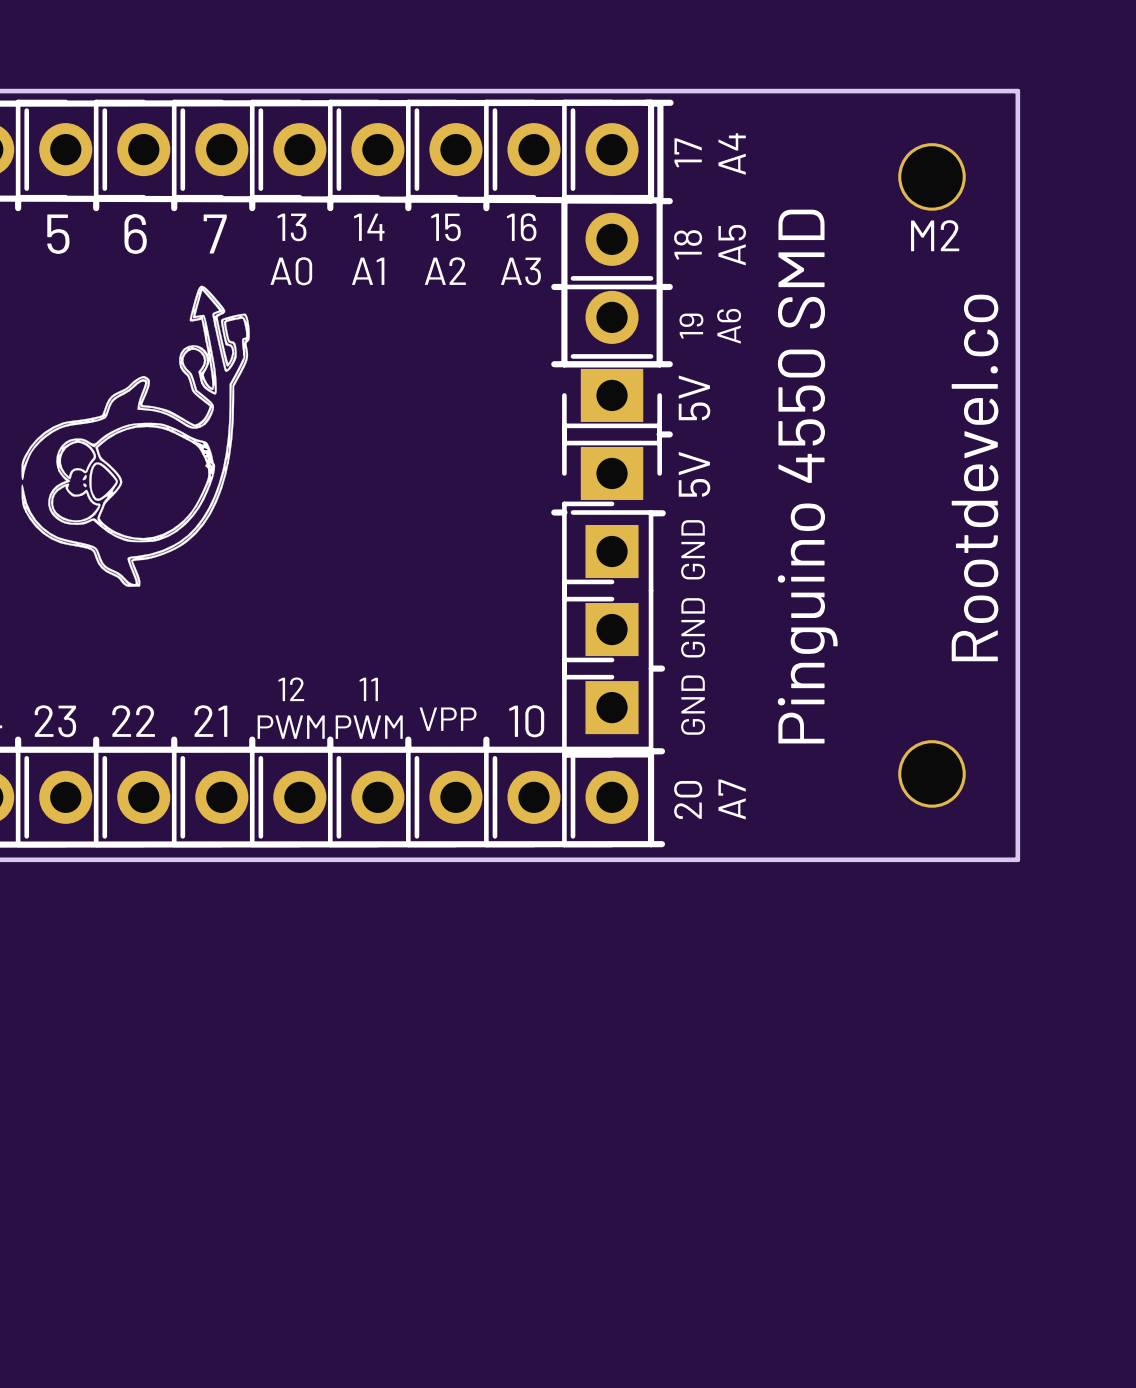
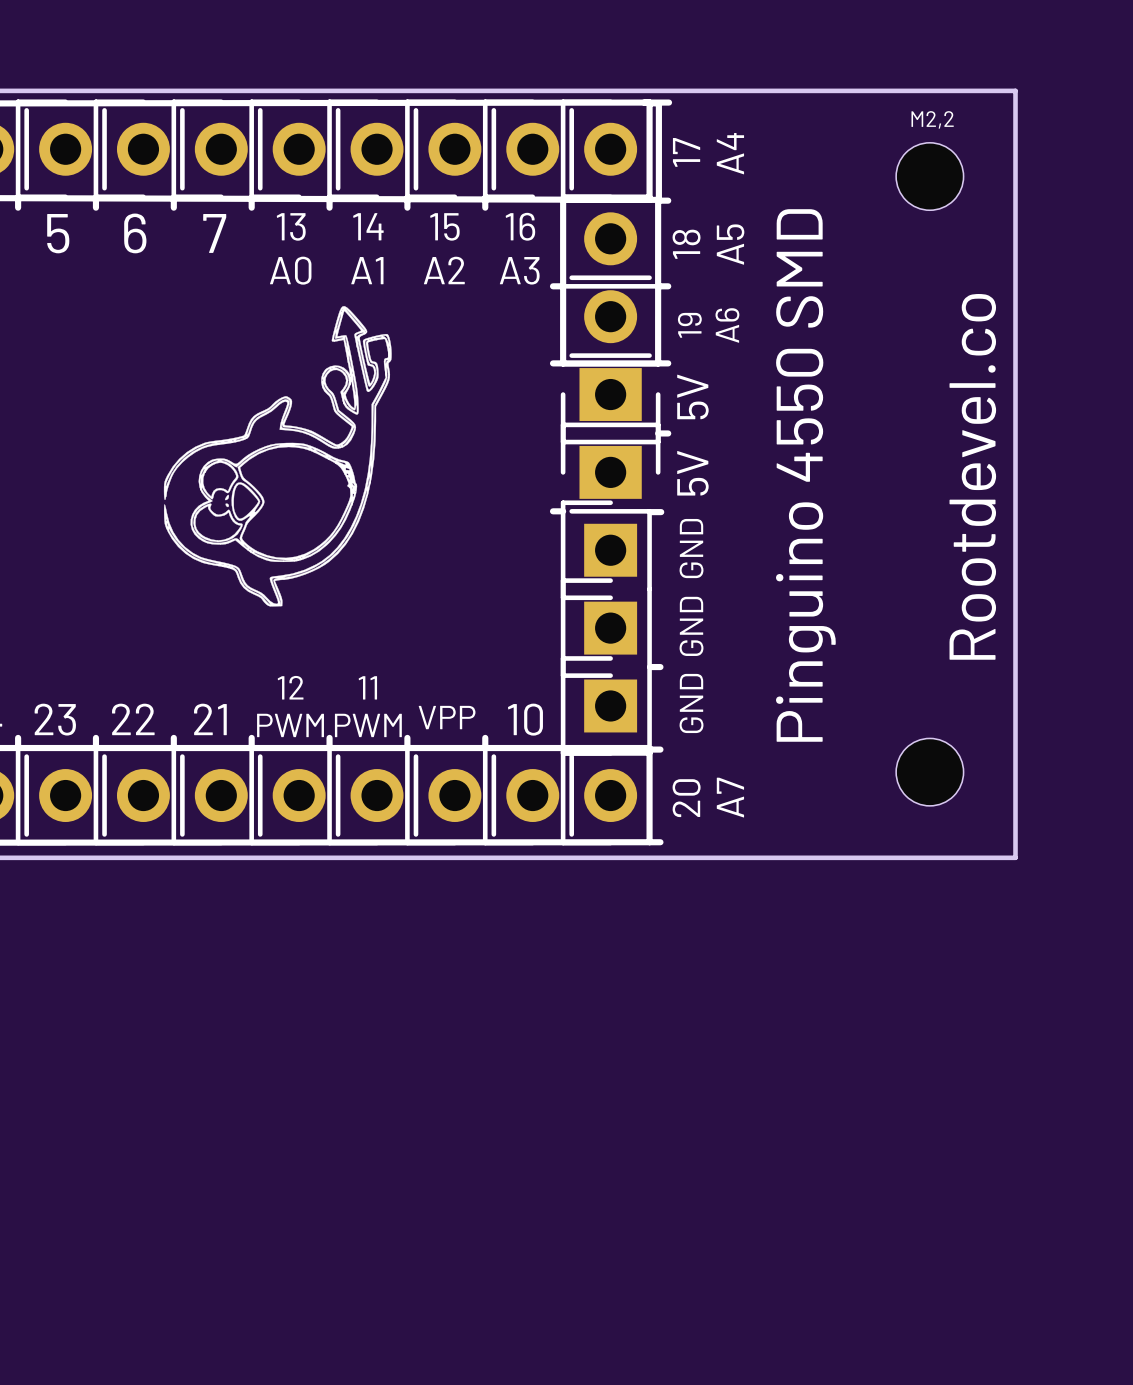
M2: (931, 176) -> none
M2,2: none -> (929, 176)
drawing position: (135, 436) -> (277, 456)
part footprint: [898, 740, 966, 808] -> [896, 738, 964, 806]

